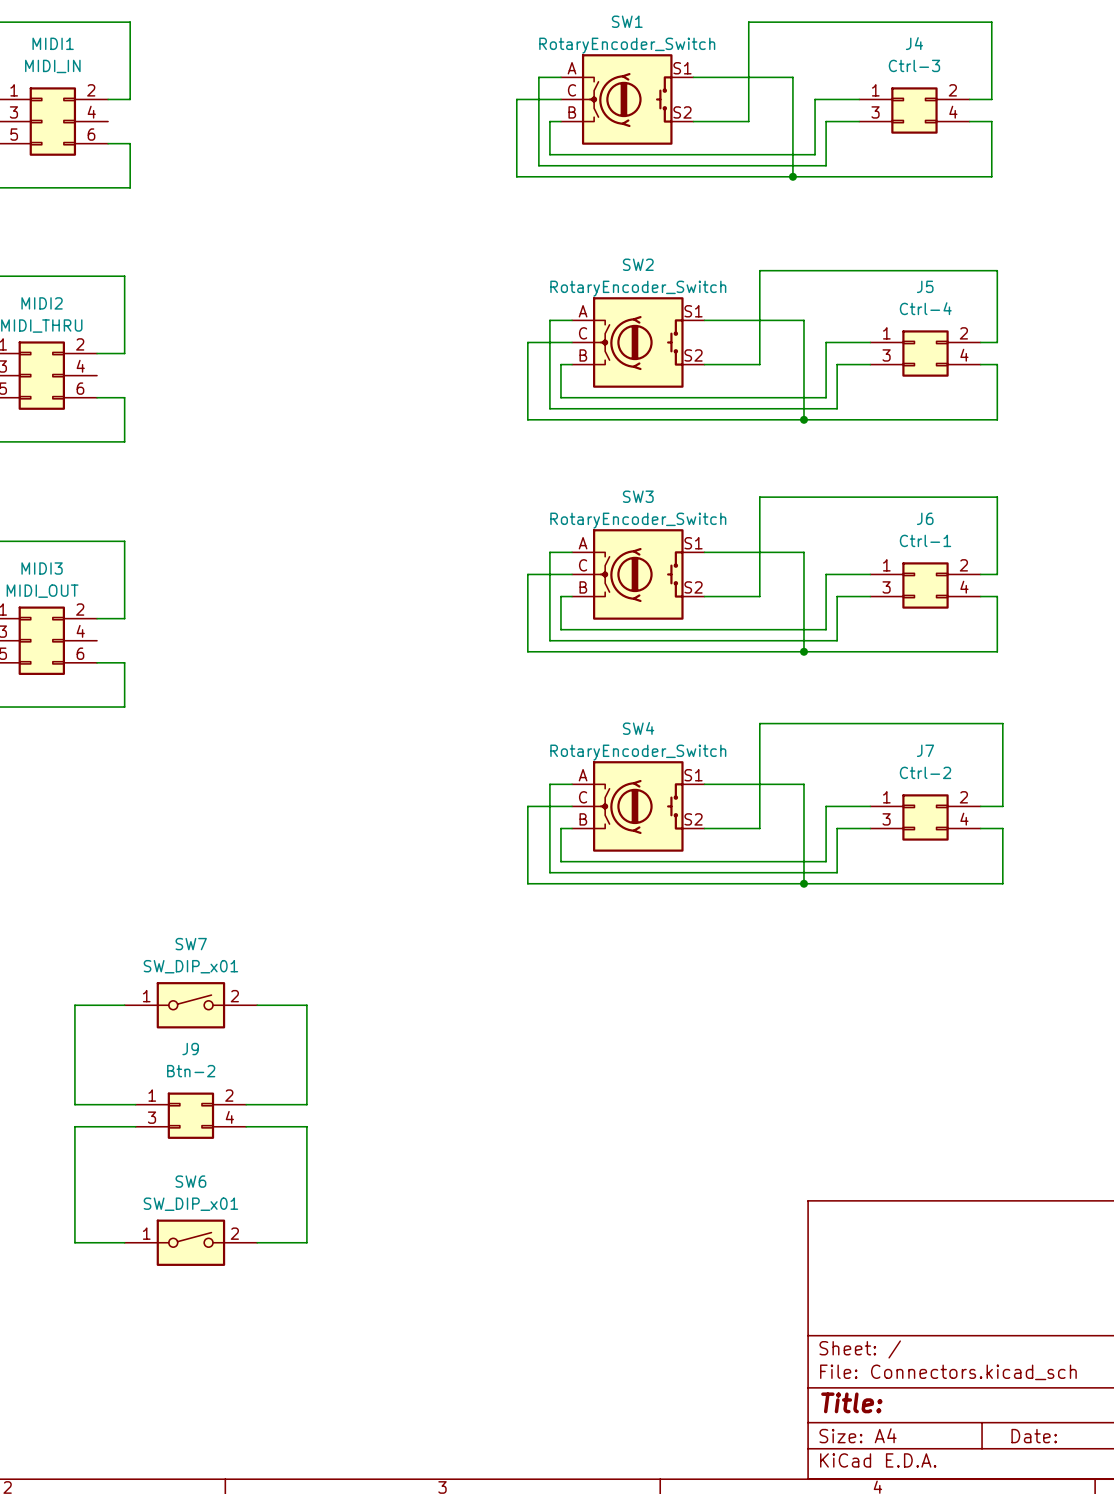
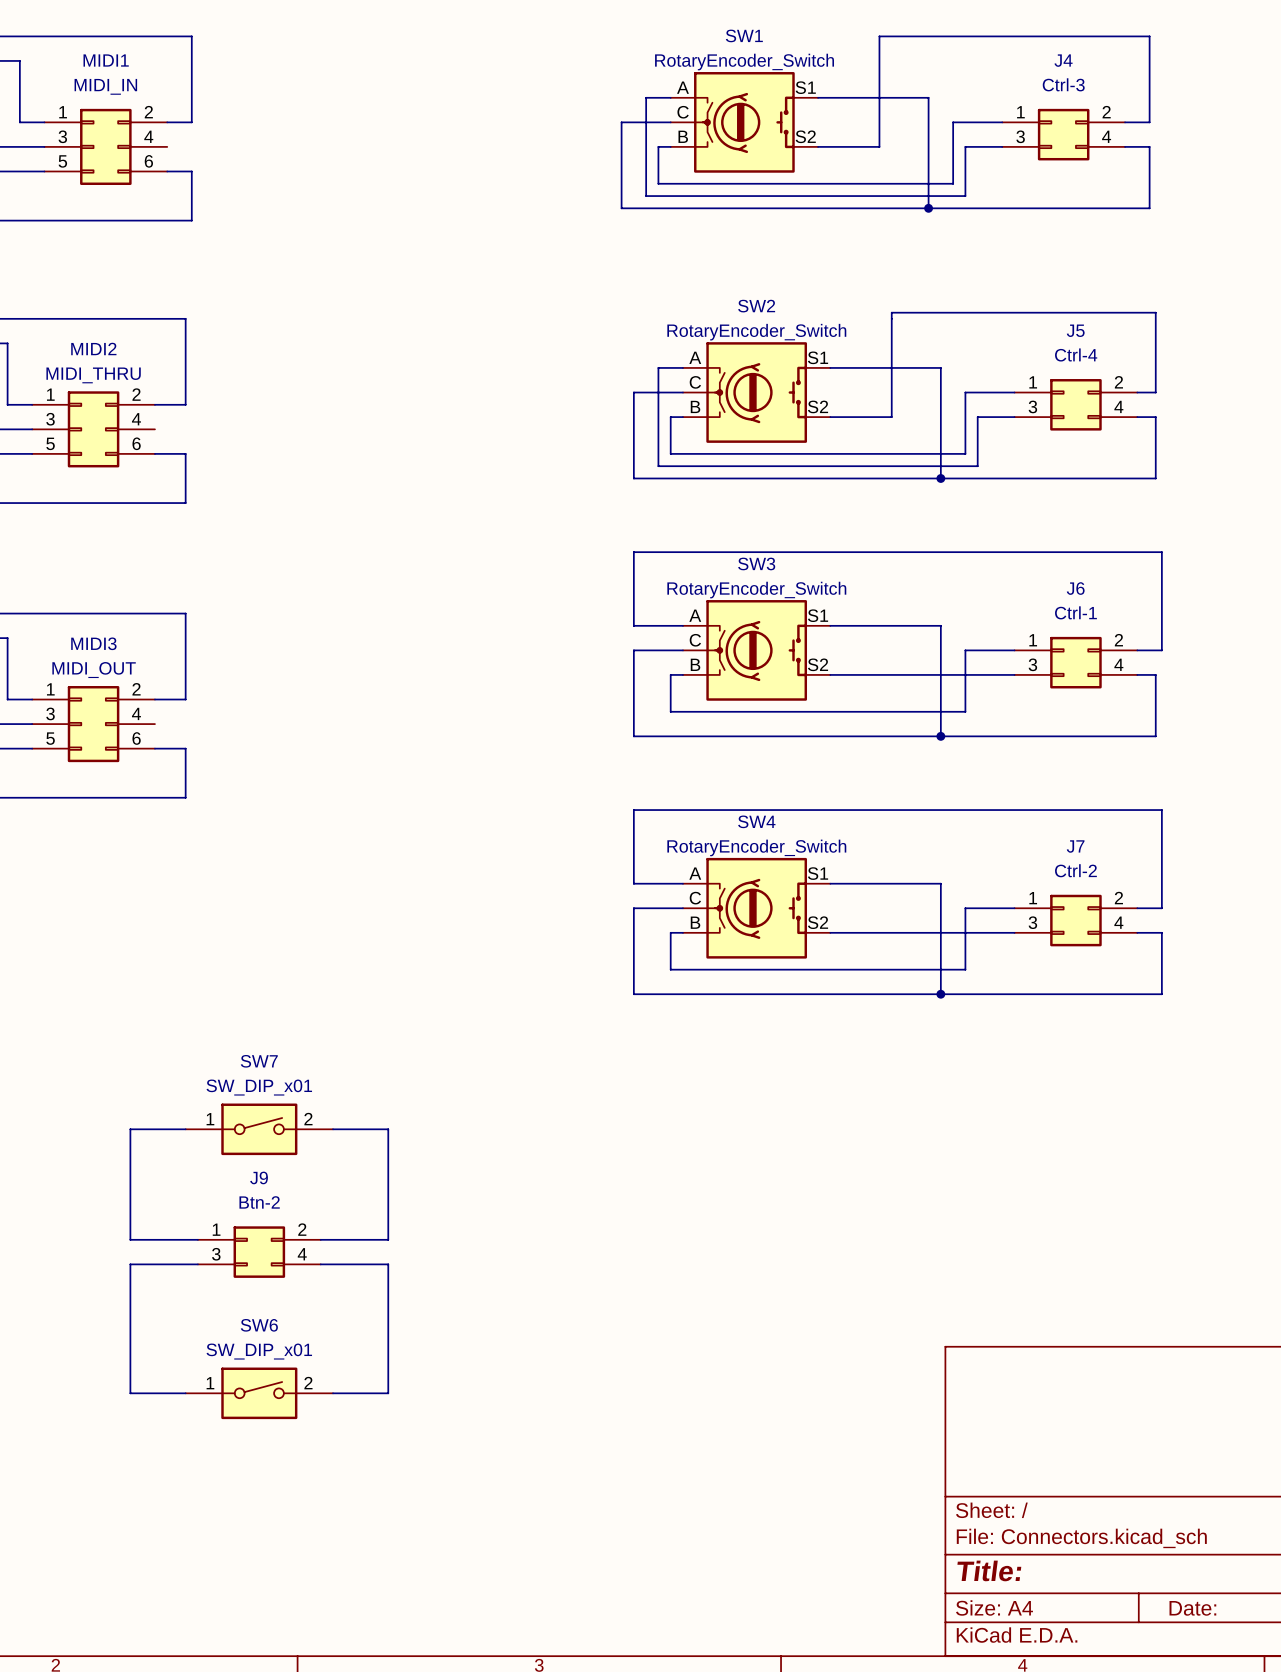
wire: (549, 552) (549, 640) (837, 640) (837, 596) -> (658, 625) (633, 625) (633, 552) (1161, 552) (1161, 650) (1155, 650)
wire: (997, 574) (997, 497) (759, 497) (759, 596) -> (977, 674) (891, 674)
wire: (1002, 723) (759, 723) (759, 828) -> (977, 932) (891, 932)
wire: (549, 784) (549, 872) (837, 872) (837, 828) -> (658, 883) (633, 883) (633, 810) (1161, 810) (1161, 816)

